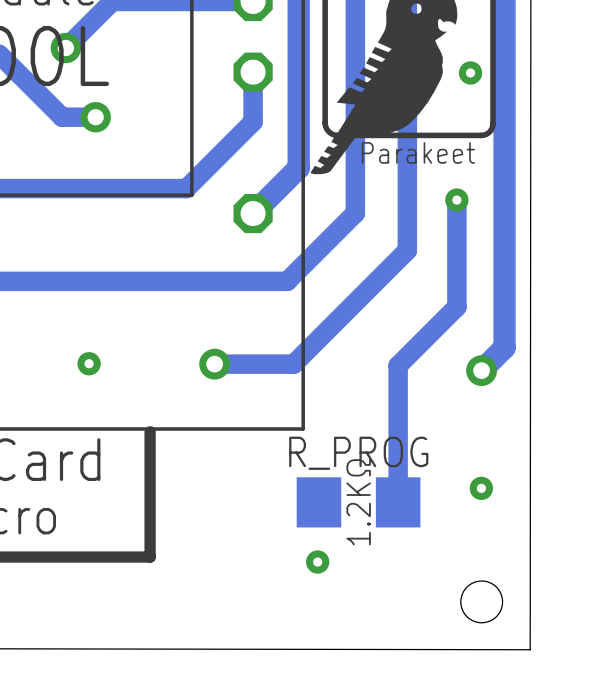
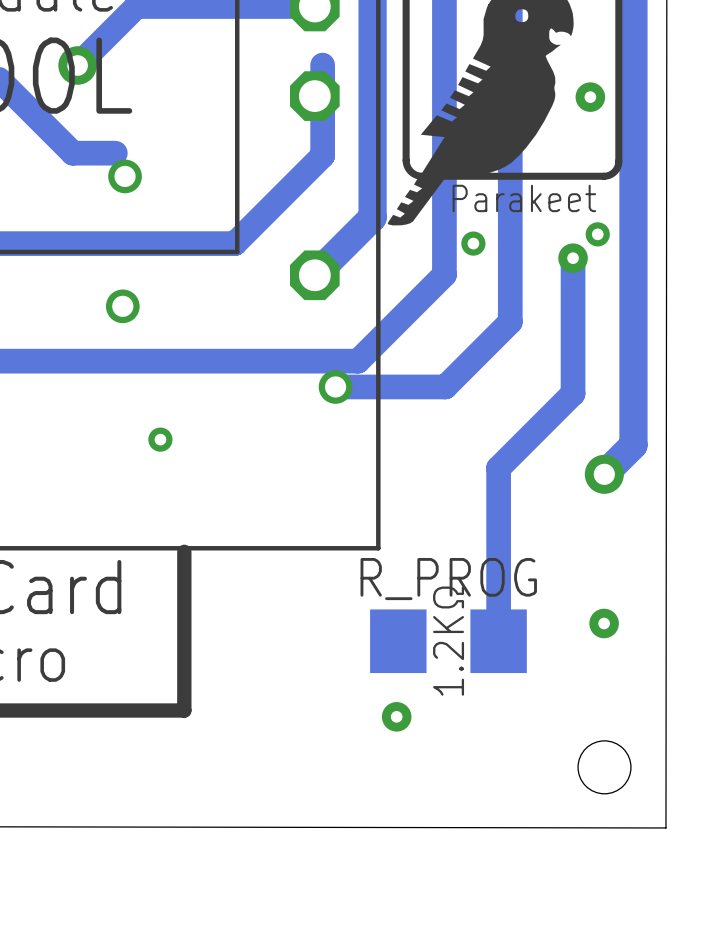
track: (253, 72) (253, 121) (186, 188) -> (322, 65) (322, 155) (234, 243) (230, 243)
via position: (95, 117) -> (125, 176)
via: none -> (597, 234)
via: none -> (473, 243)
via: none -> (122, 306)
via: none -> (335, 386)
track: (356, 301) (293, 364) (214, 364) -> (445, 386) (335, 386)
via: none -> (160, 439)
via: (89, 363) -> none
via: (214, 364) -> none

